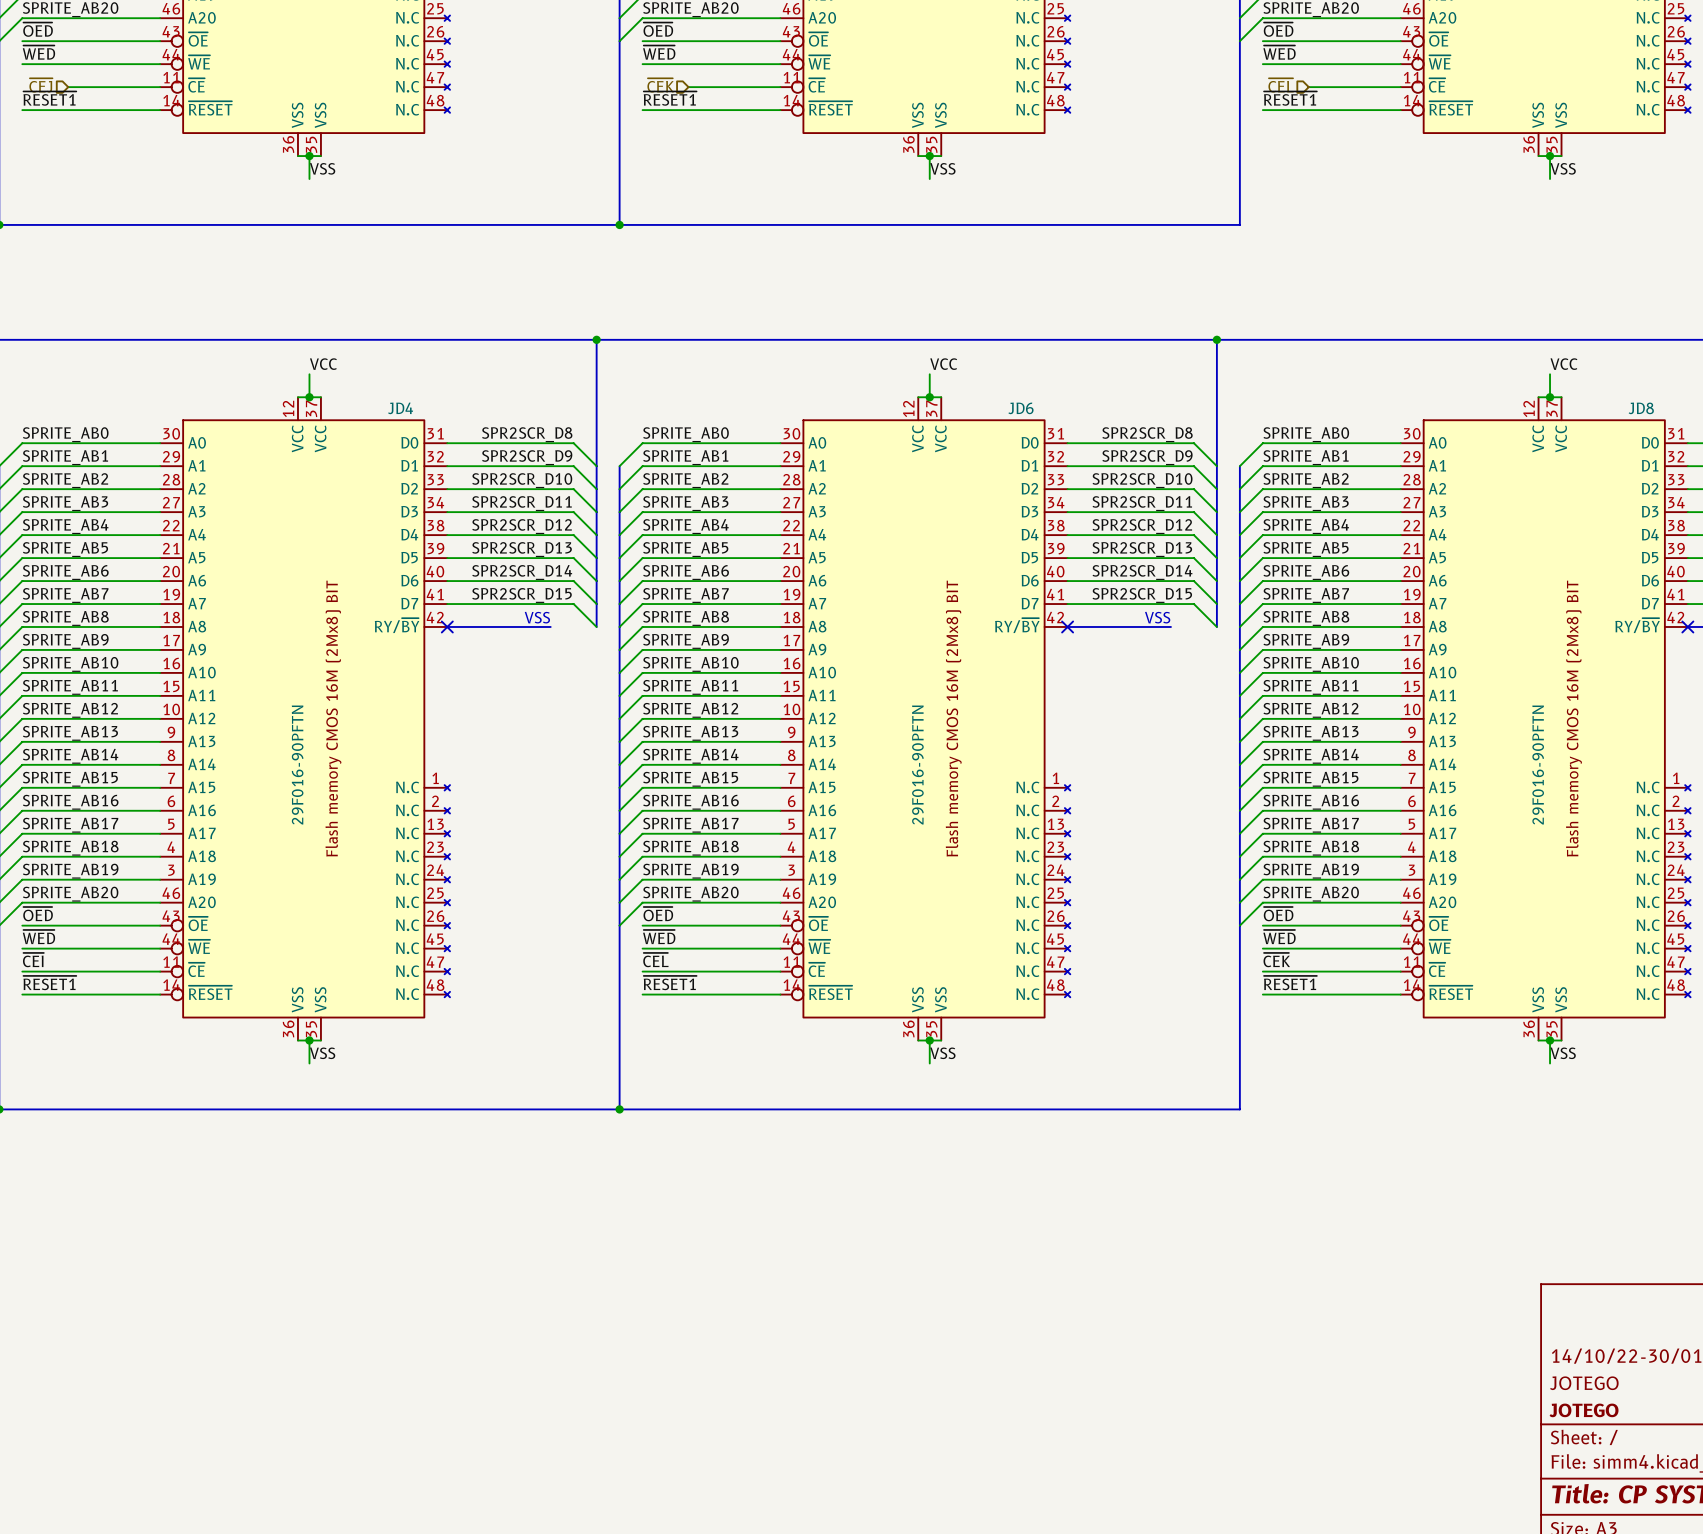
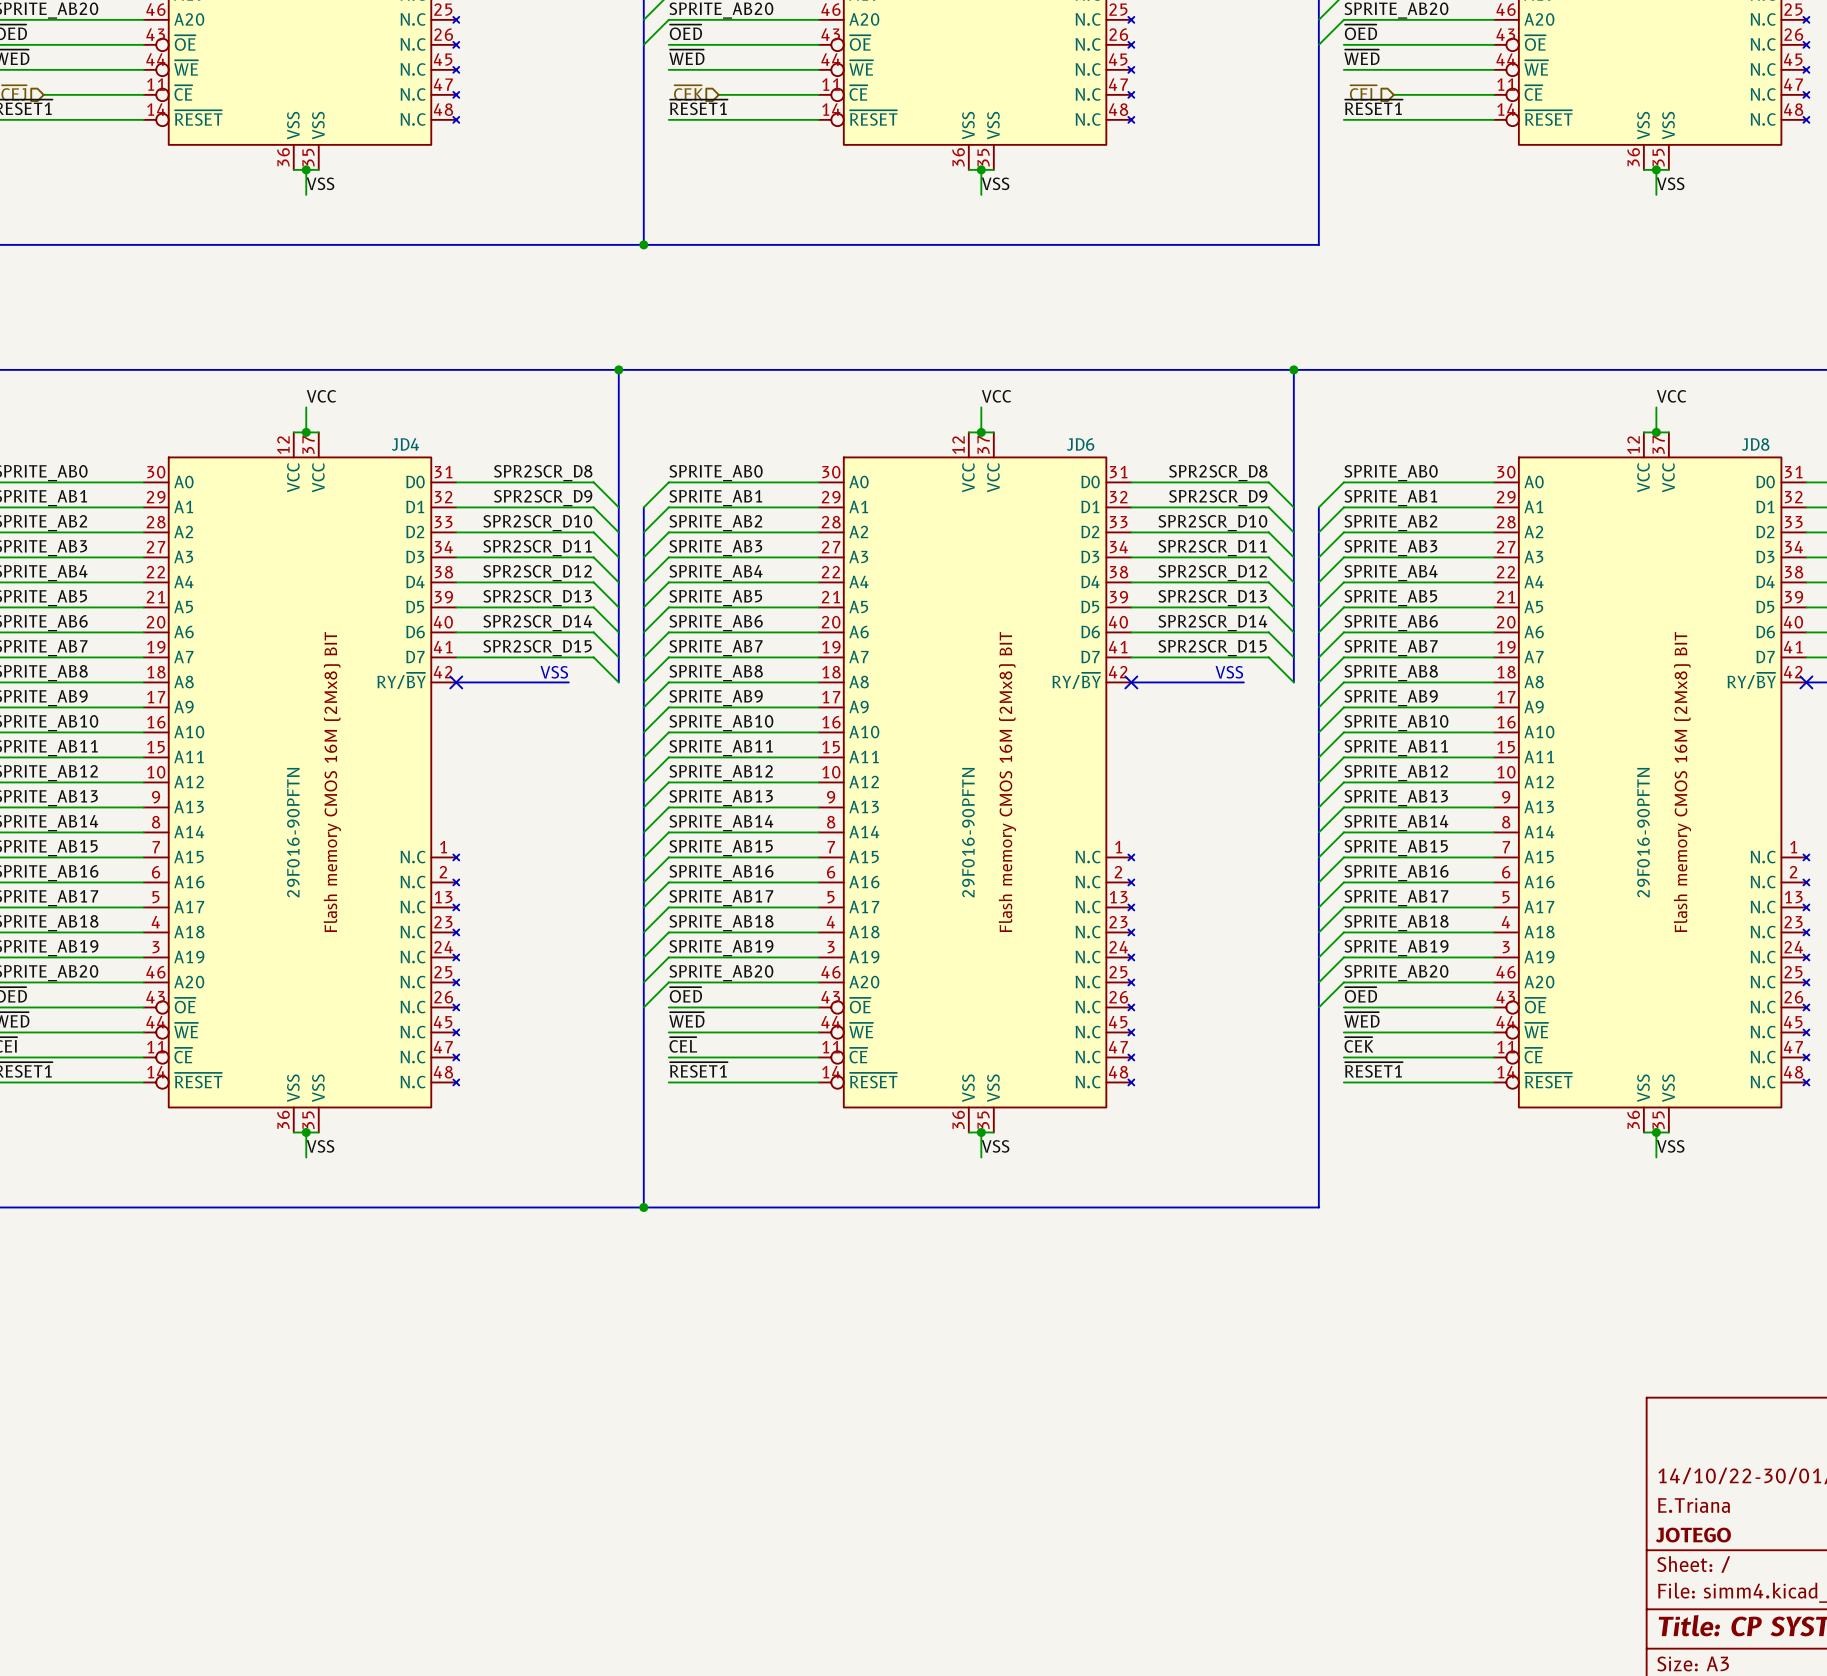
title block: JOTEGO (1584, 1383) -> E.Triana (1694, 1505)

